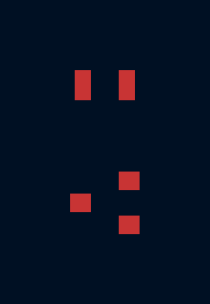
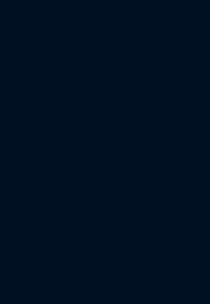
part: (104, 85) -> none
part: (104, 202) -> none

